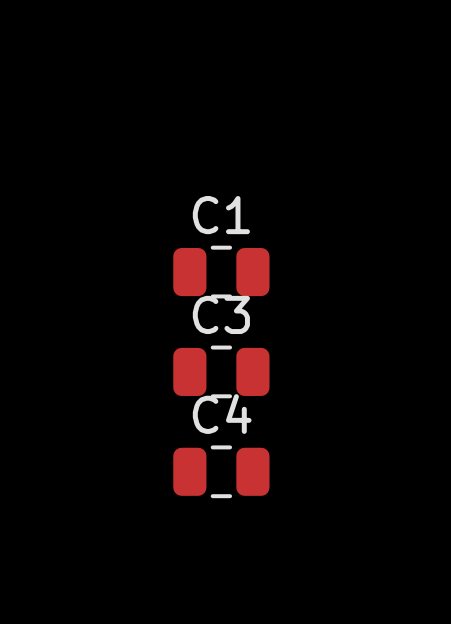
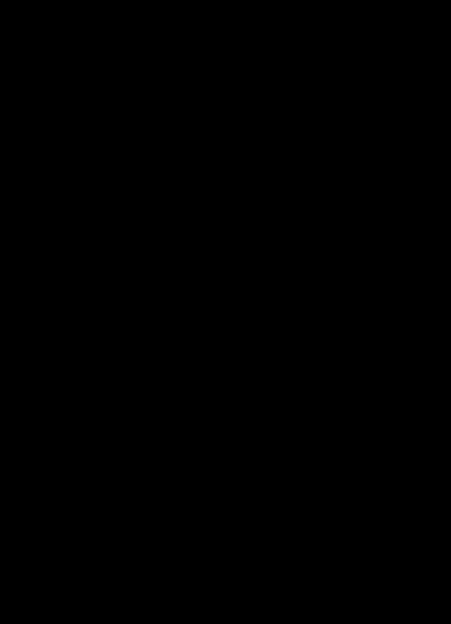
C1: (221, 272) -> none
C3: (221, 371) -> none
C4: (221, 471) -> none

